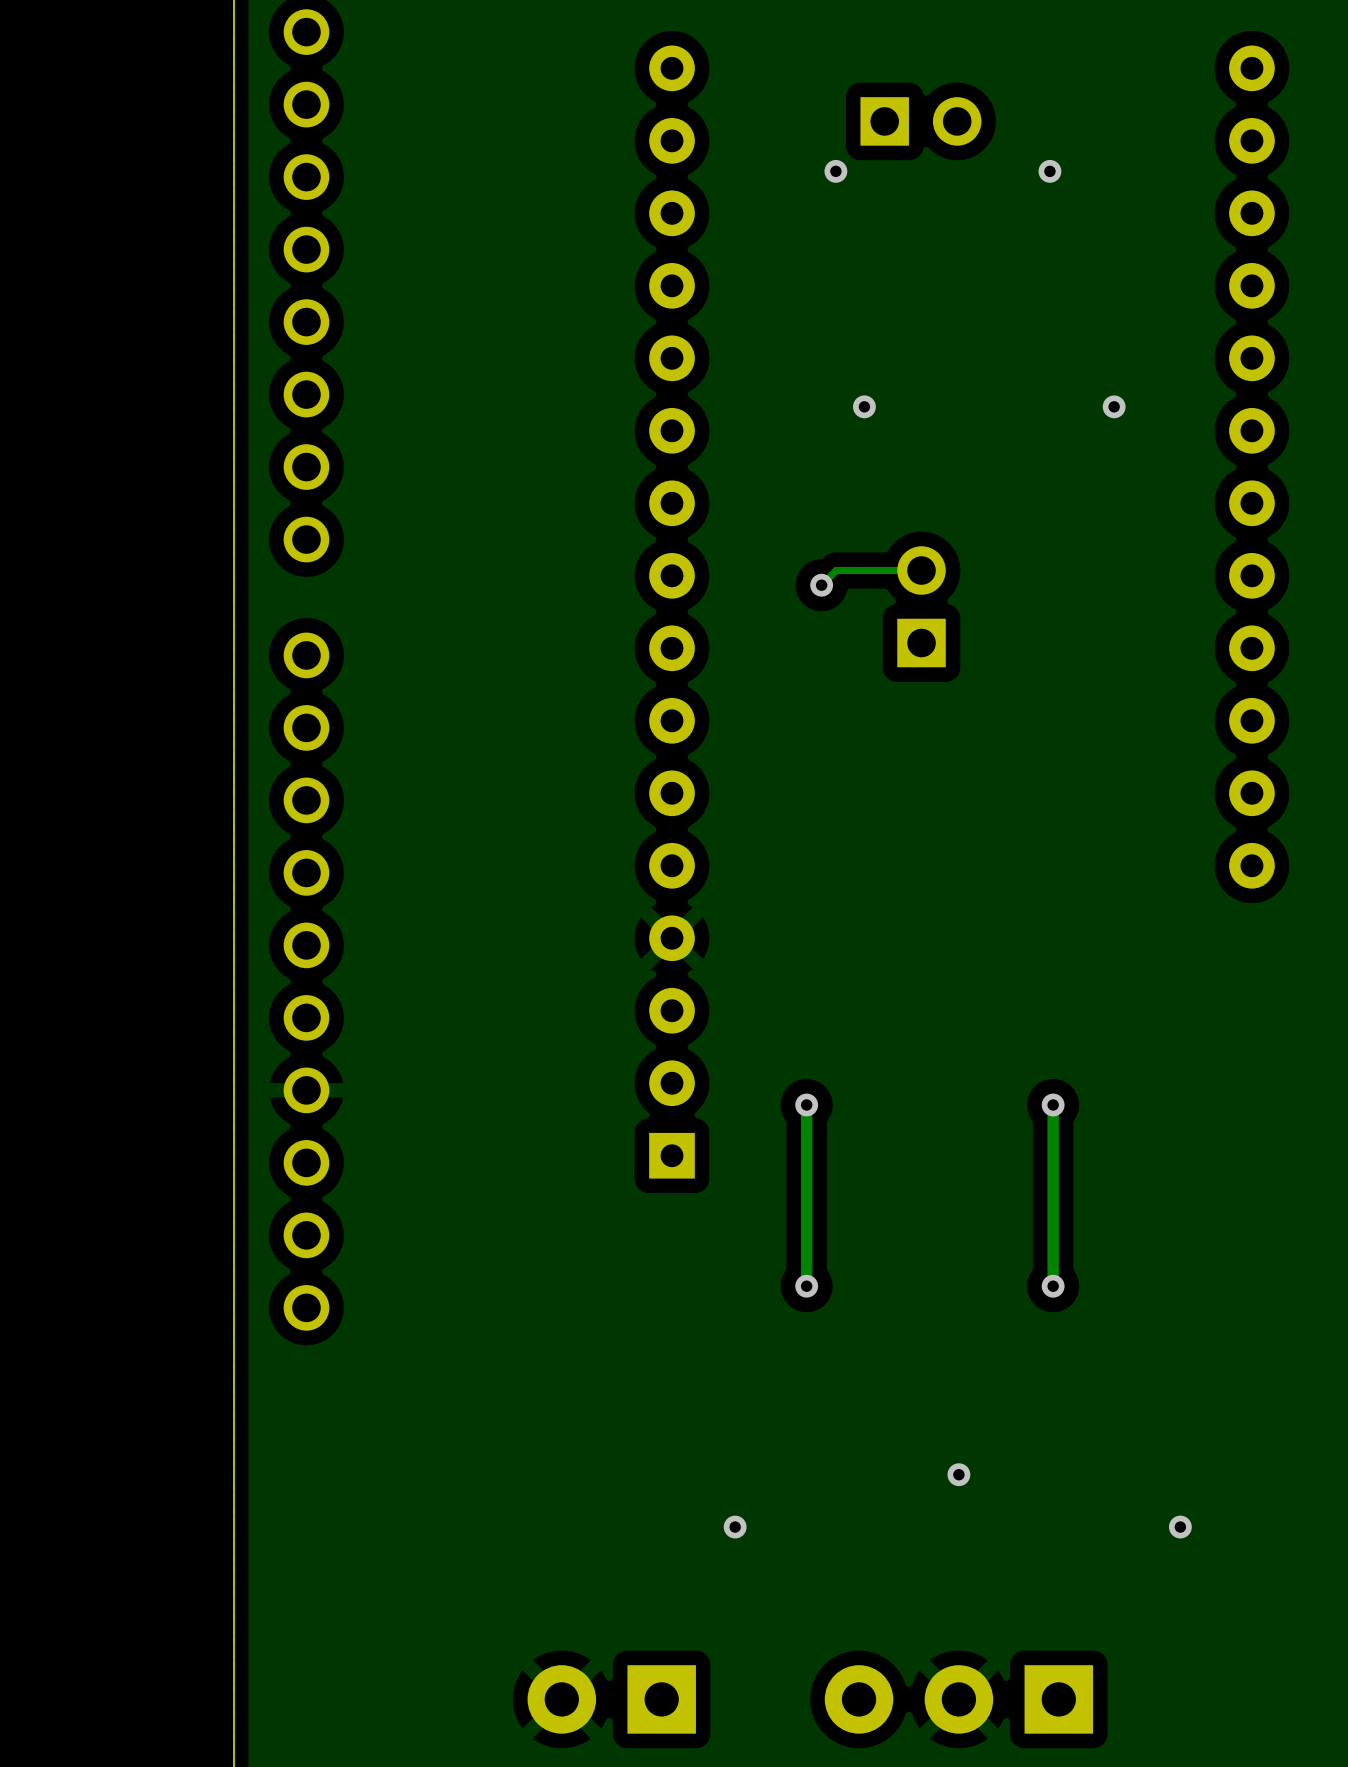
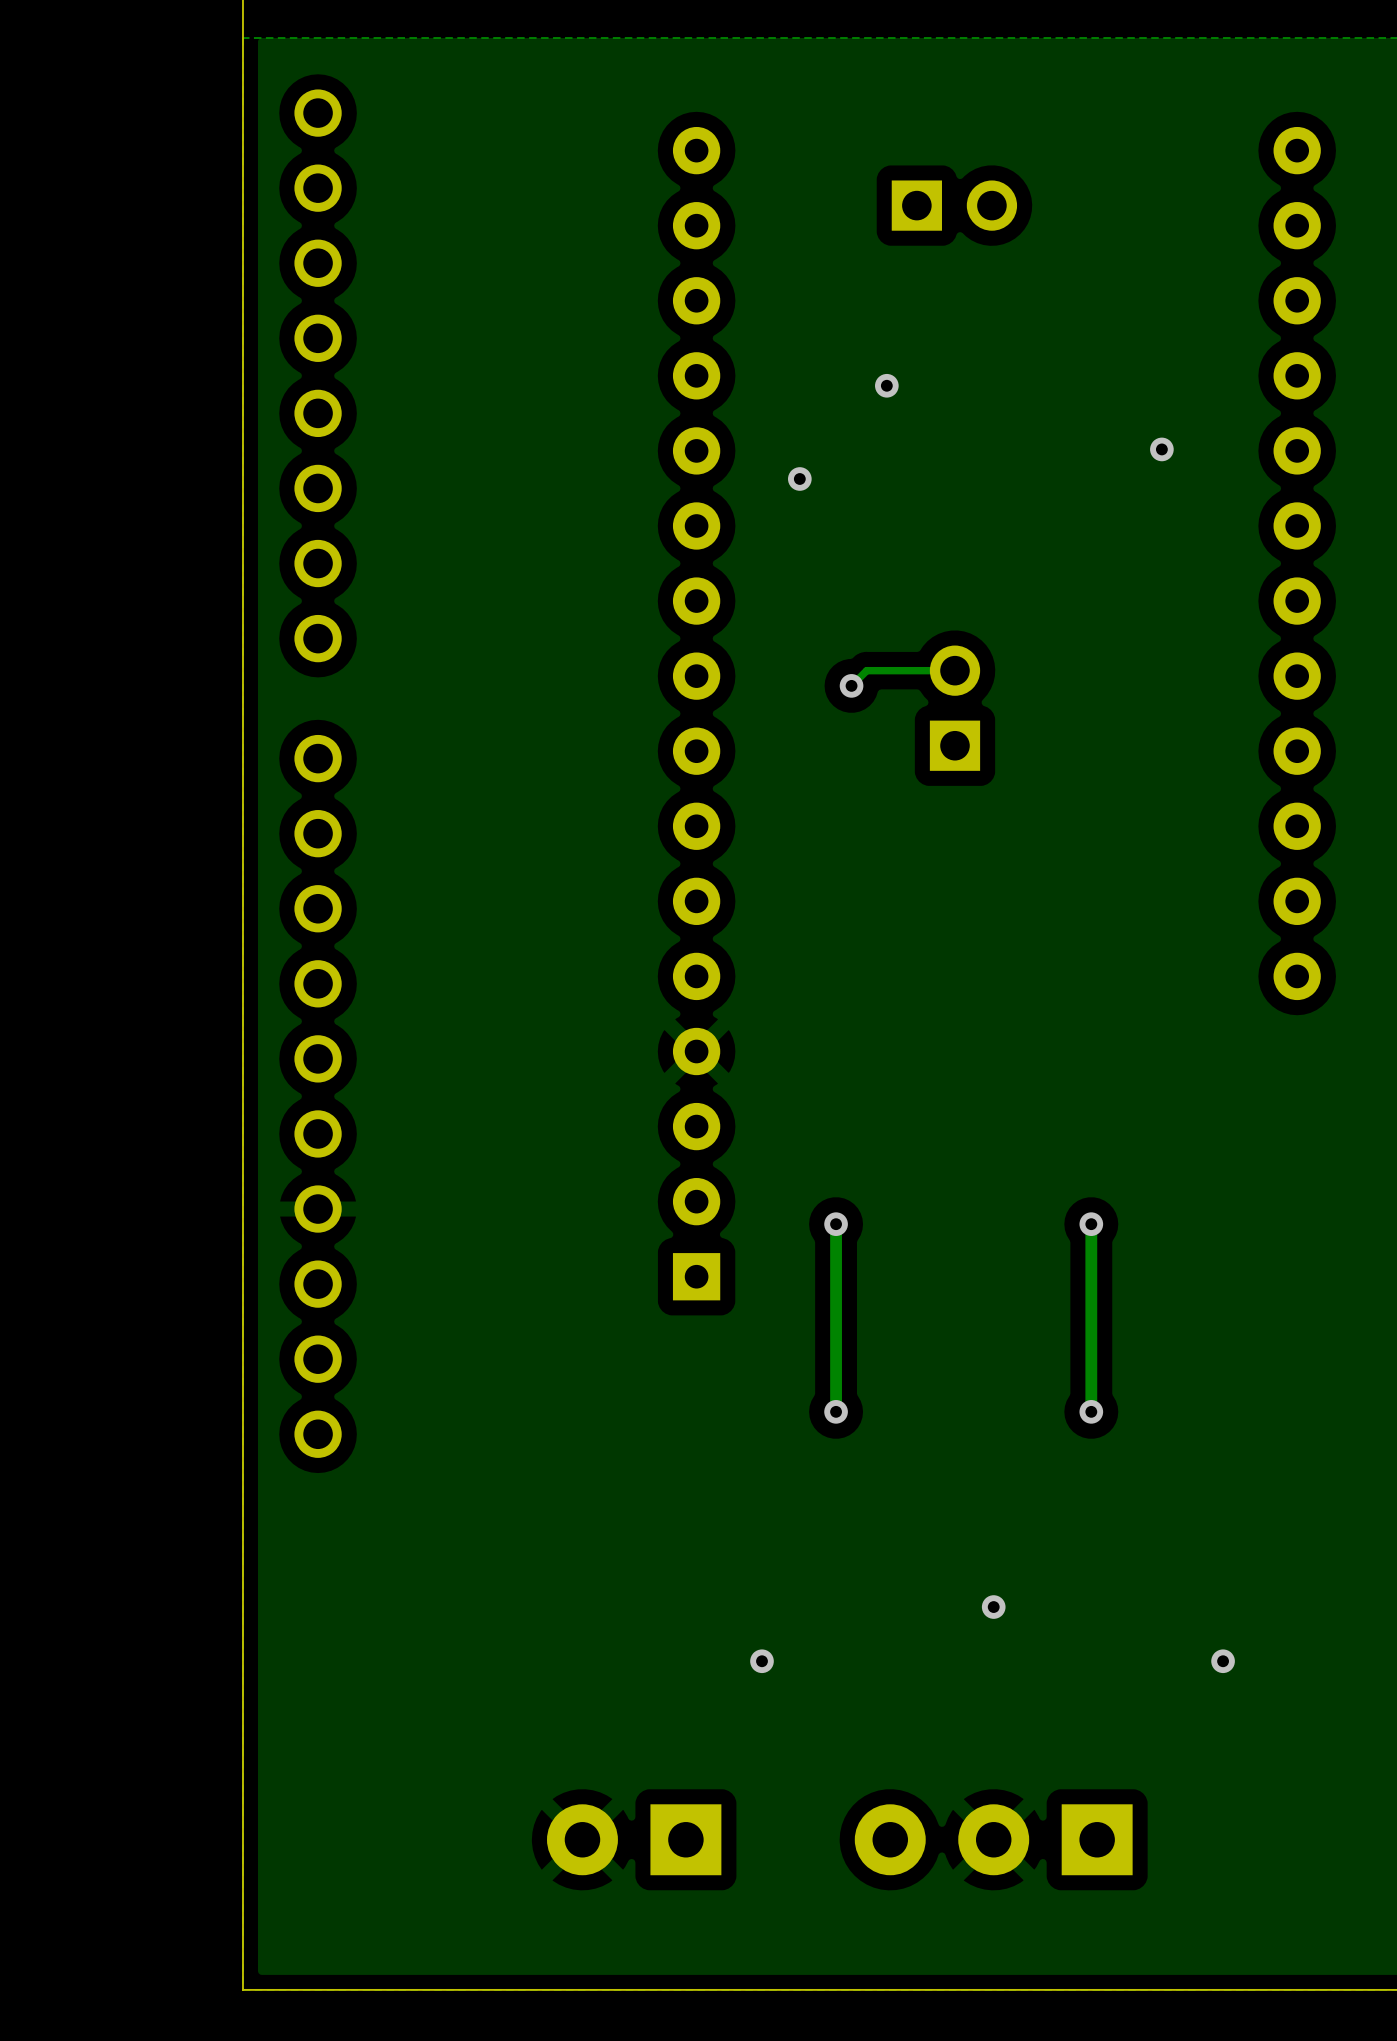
via: (835, 171) -> none
via: (1049, 171) -> none
via: none -> (886, 385)
via: none -> (799, 478)
via: (864, 406) -> none
via position: (1114, 406) -> (1161, 449)

